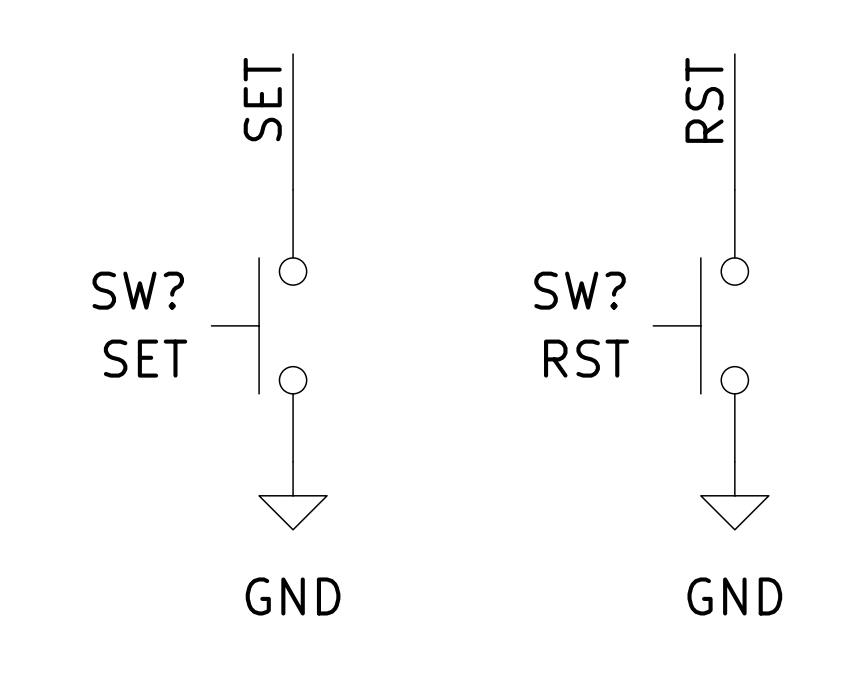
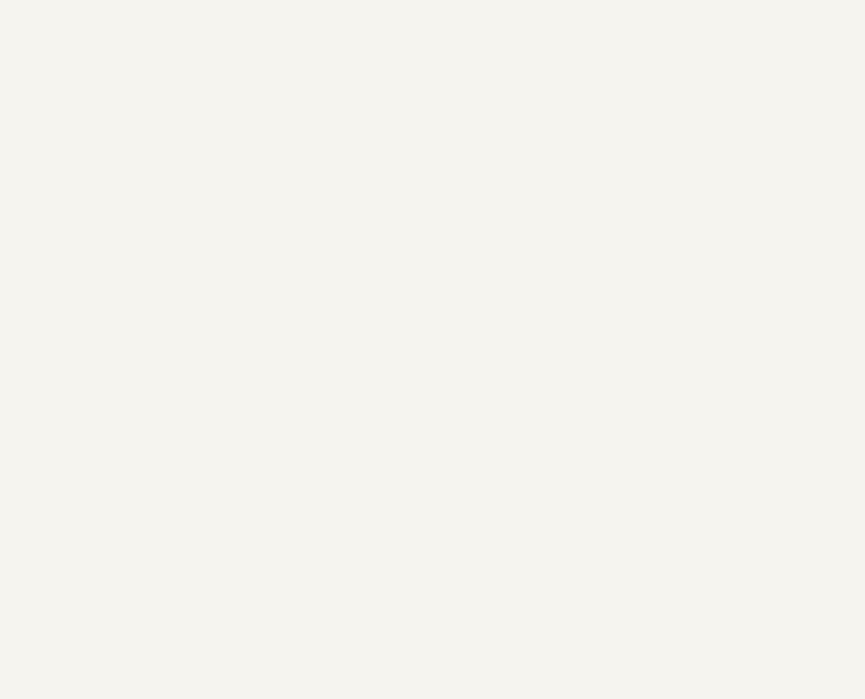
wire: (293, 54) (293, 189) -> none
wire: (734, 54) (734, 189) -> none
label: SET (262, 99) -> none
label: RST (704, 100) -> none
SW?: SET (259, 325) -> none
SW?: RST (700, 325) -> none
power symbol: GND (293, 495) -> none
power symbol: GND (734, 495) -> none

